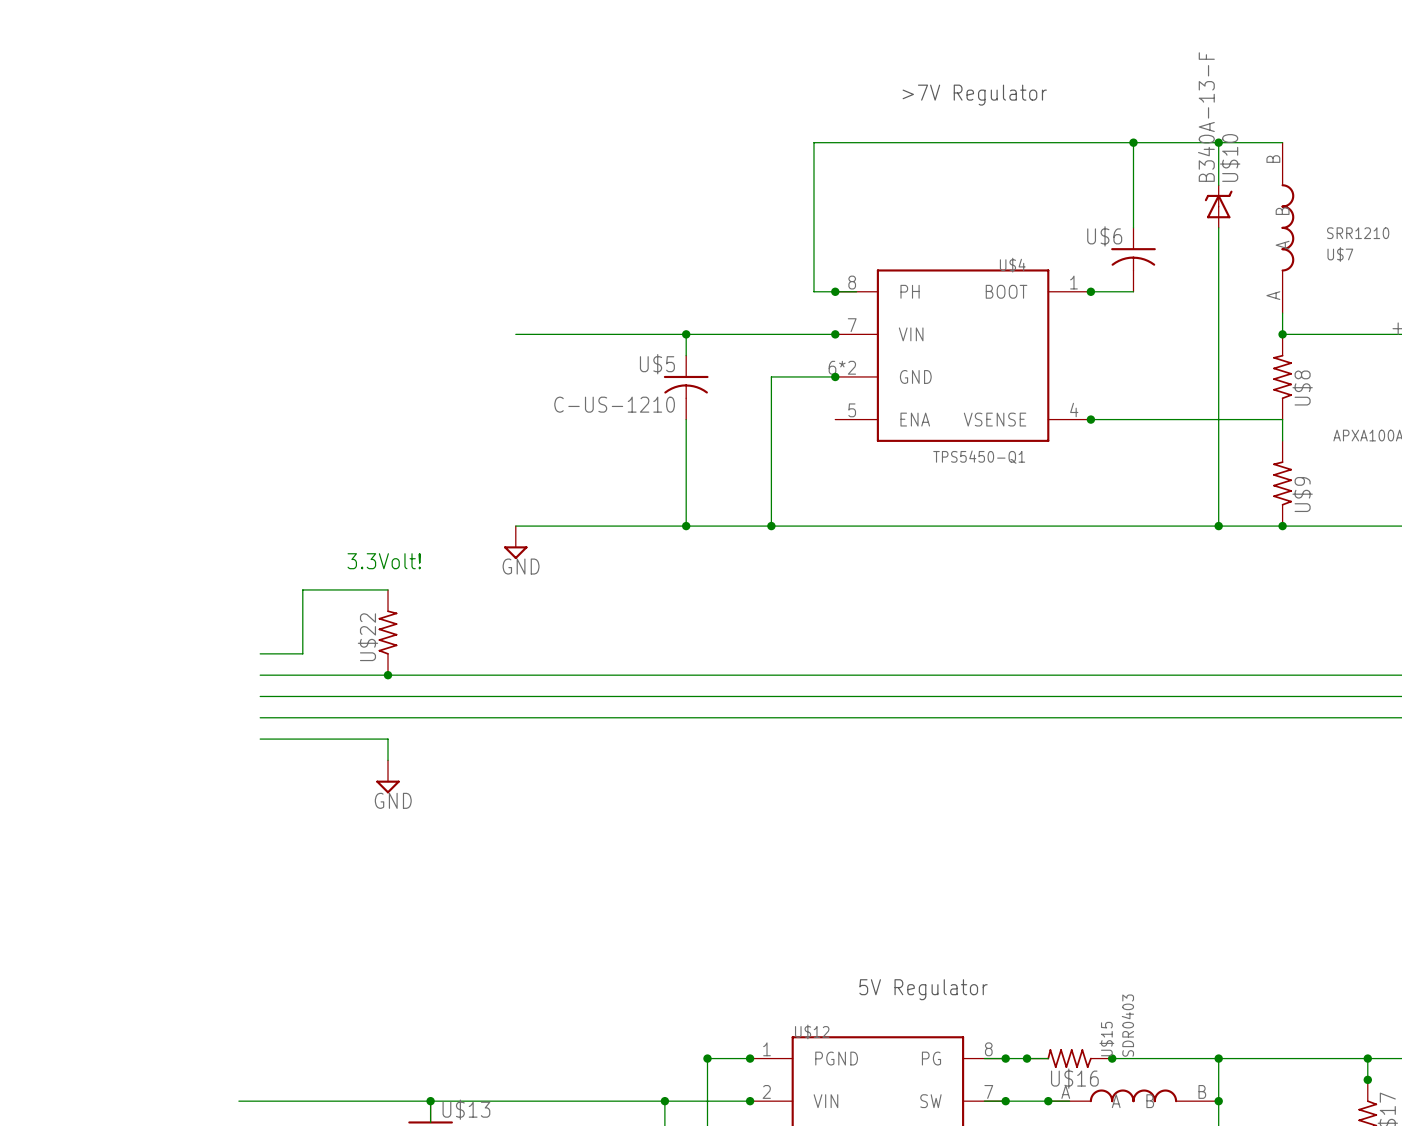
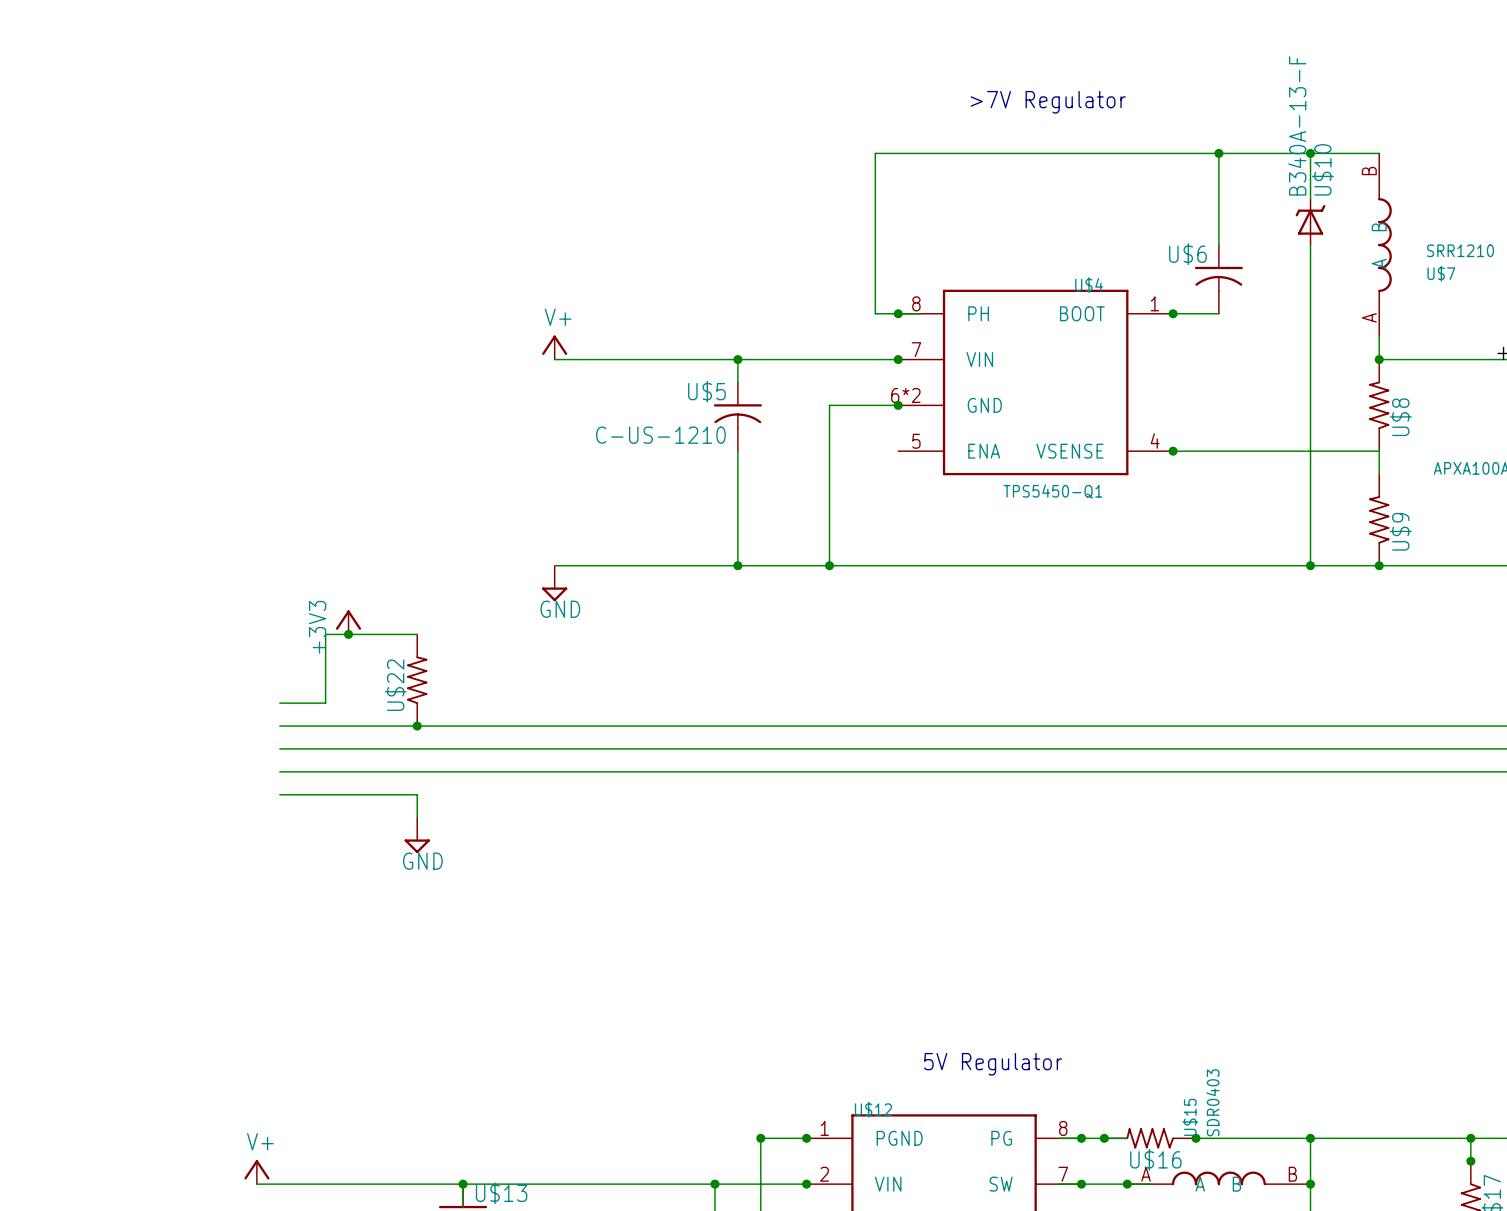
power symbol: none -> V+ (554, 347)
text: 3.3Volt! (384, 561) -> none
power symbol: none -> +3V3 (348, 622)
junction: none -> (348, 634)
power symbol: none -> V+ (256, 1172)

